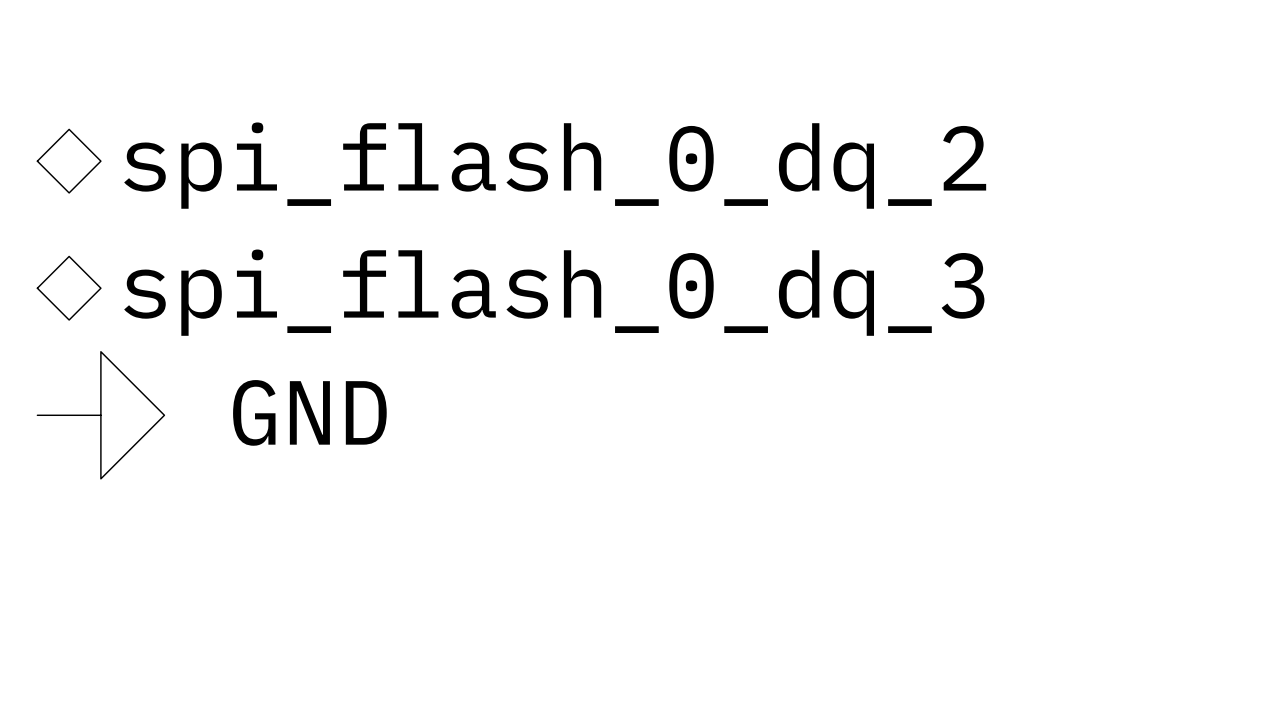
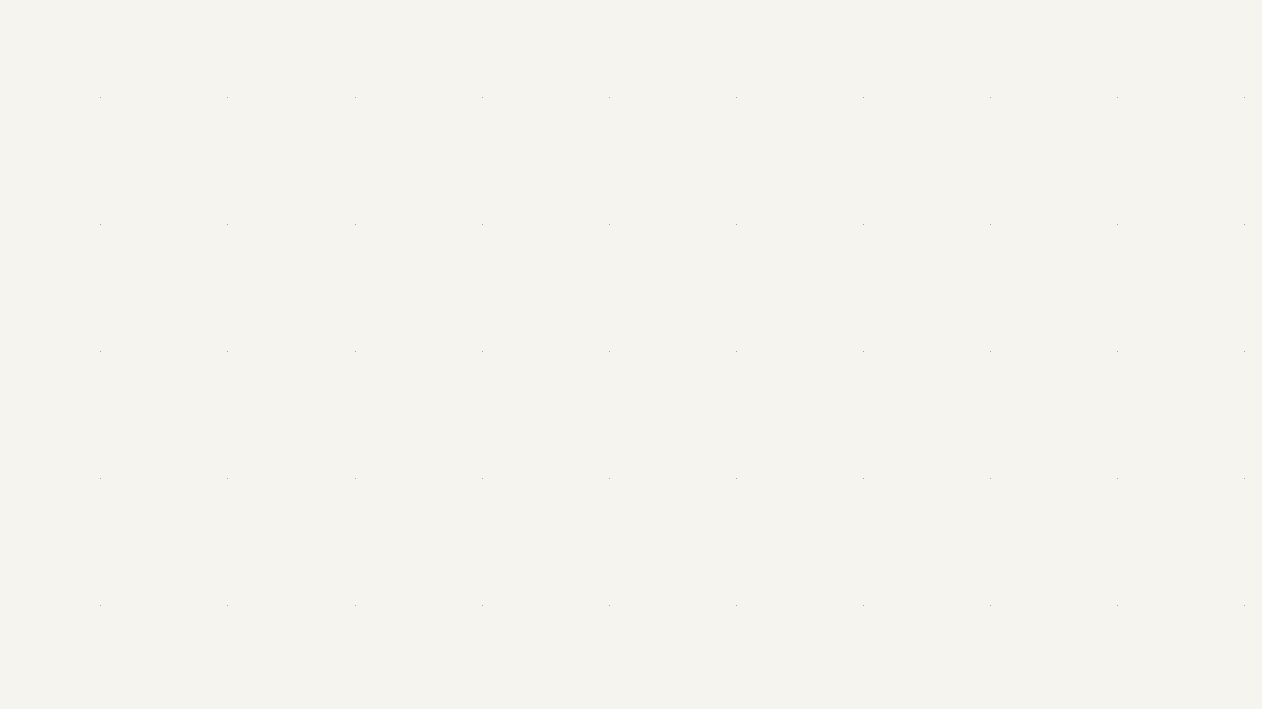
hierarchical label: spi_flash_0_dq_2 (555, 165) -> none
hierarchical label: spi_flash_0_dq_3 (554, 292) -> none
power symbol: GND (100, 415) -> none

